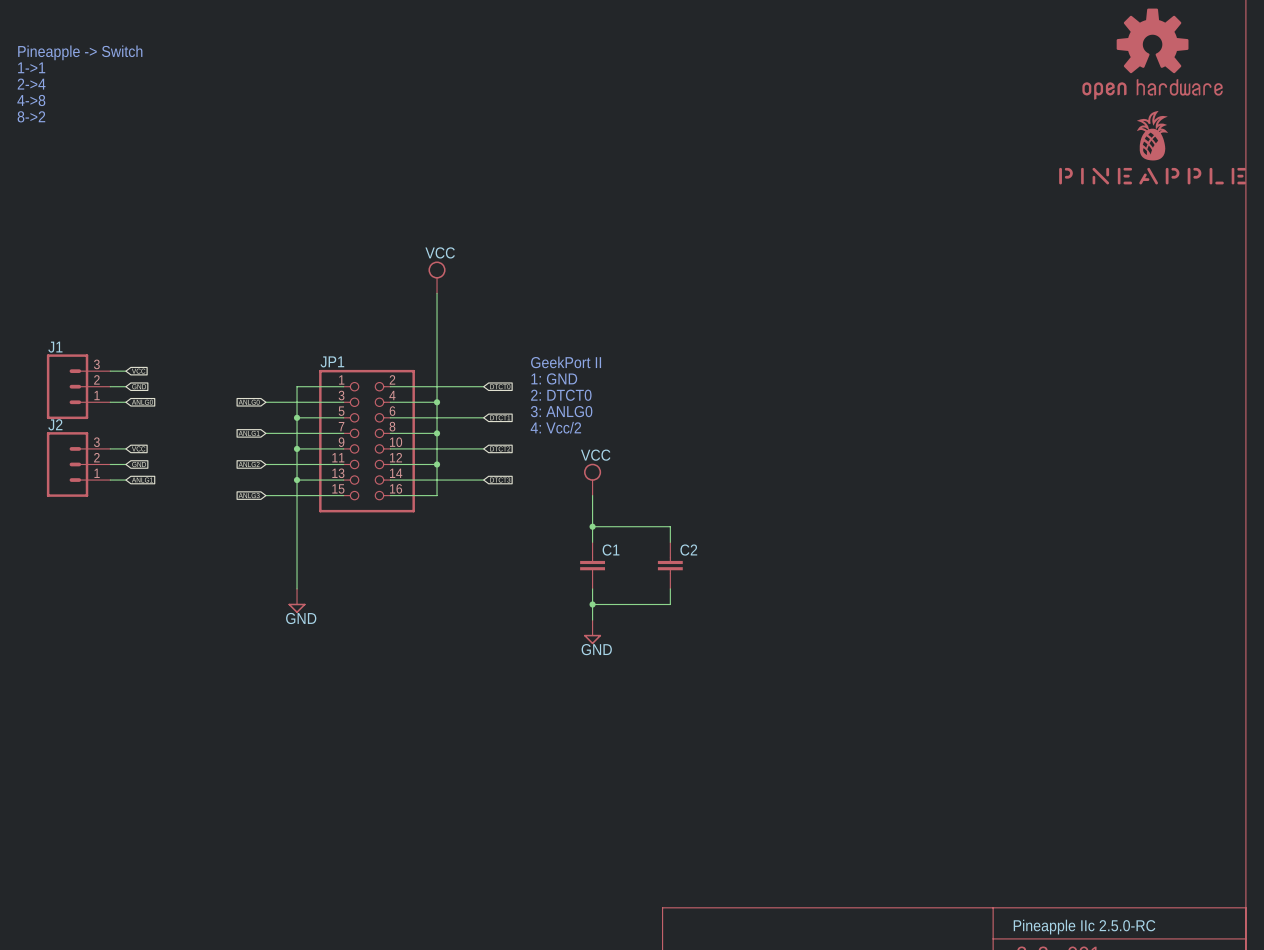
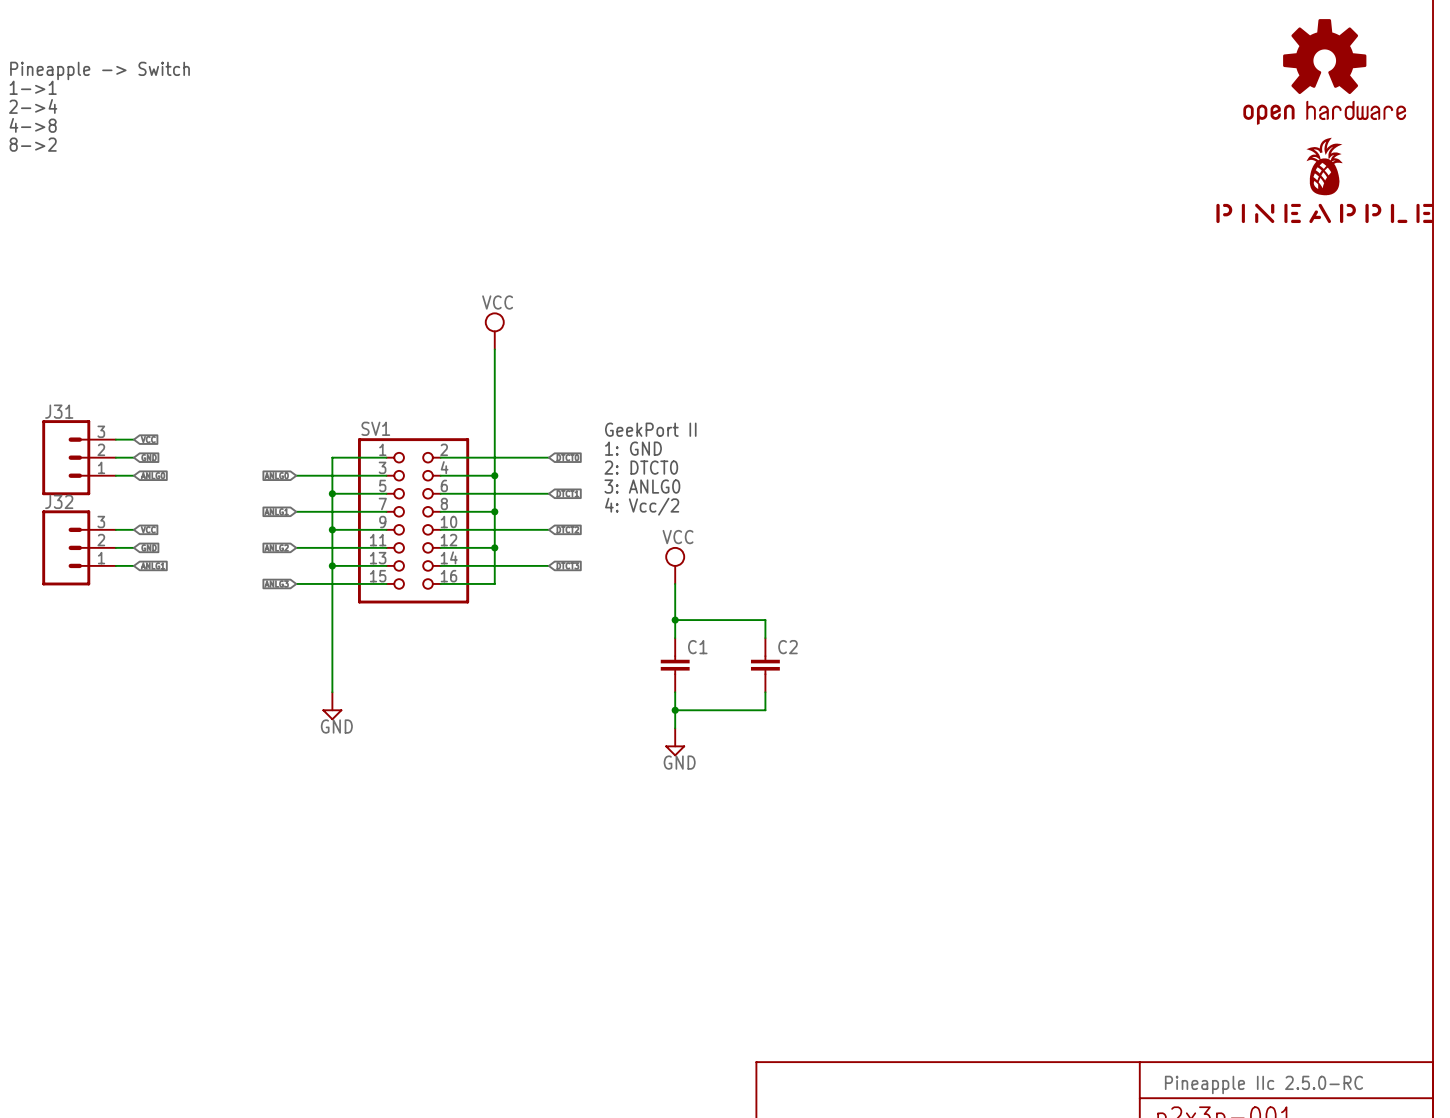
J1 name: J1 (55, 347) -> J31 (59, 411)
JP1 name: JP1 (332, 361) -> SV1 (375, 428)
J2 name: J2 (55, 424) -> J32 (59, 501)

